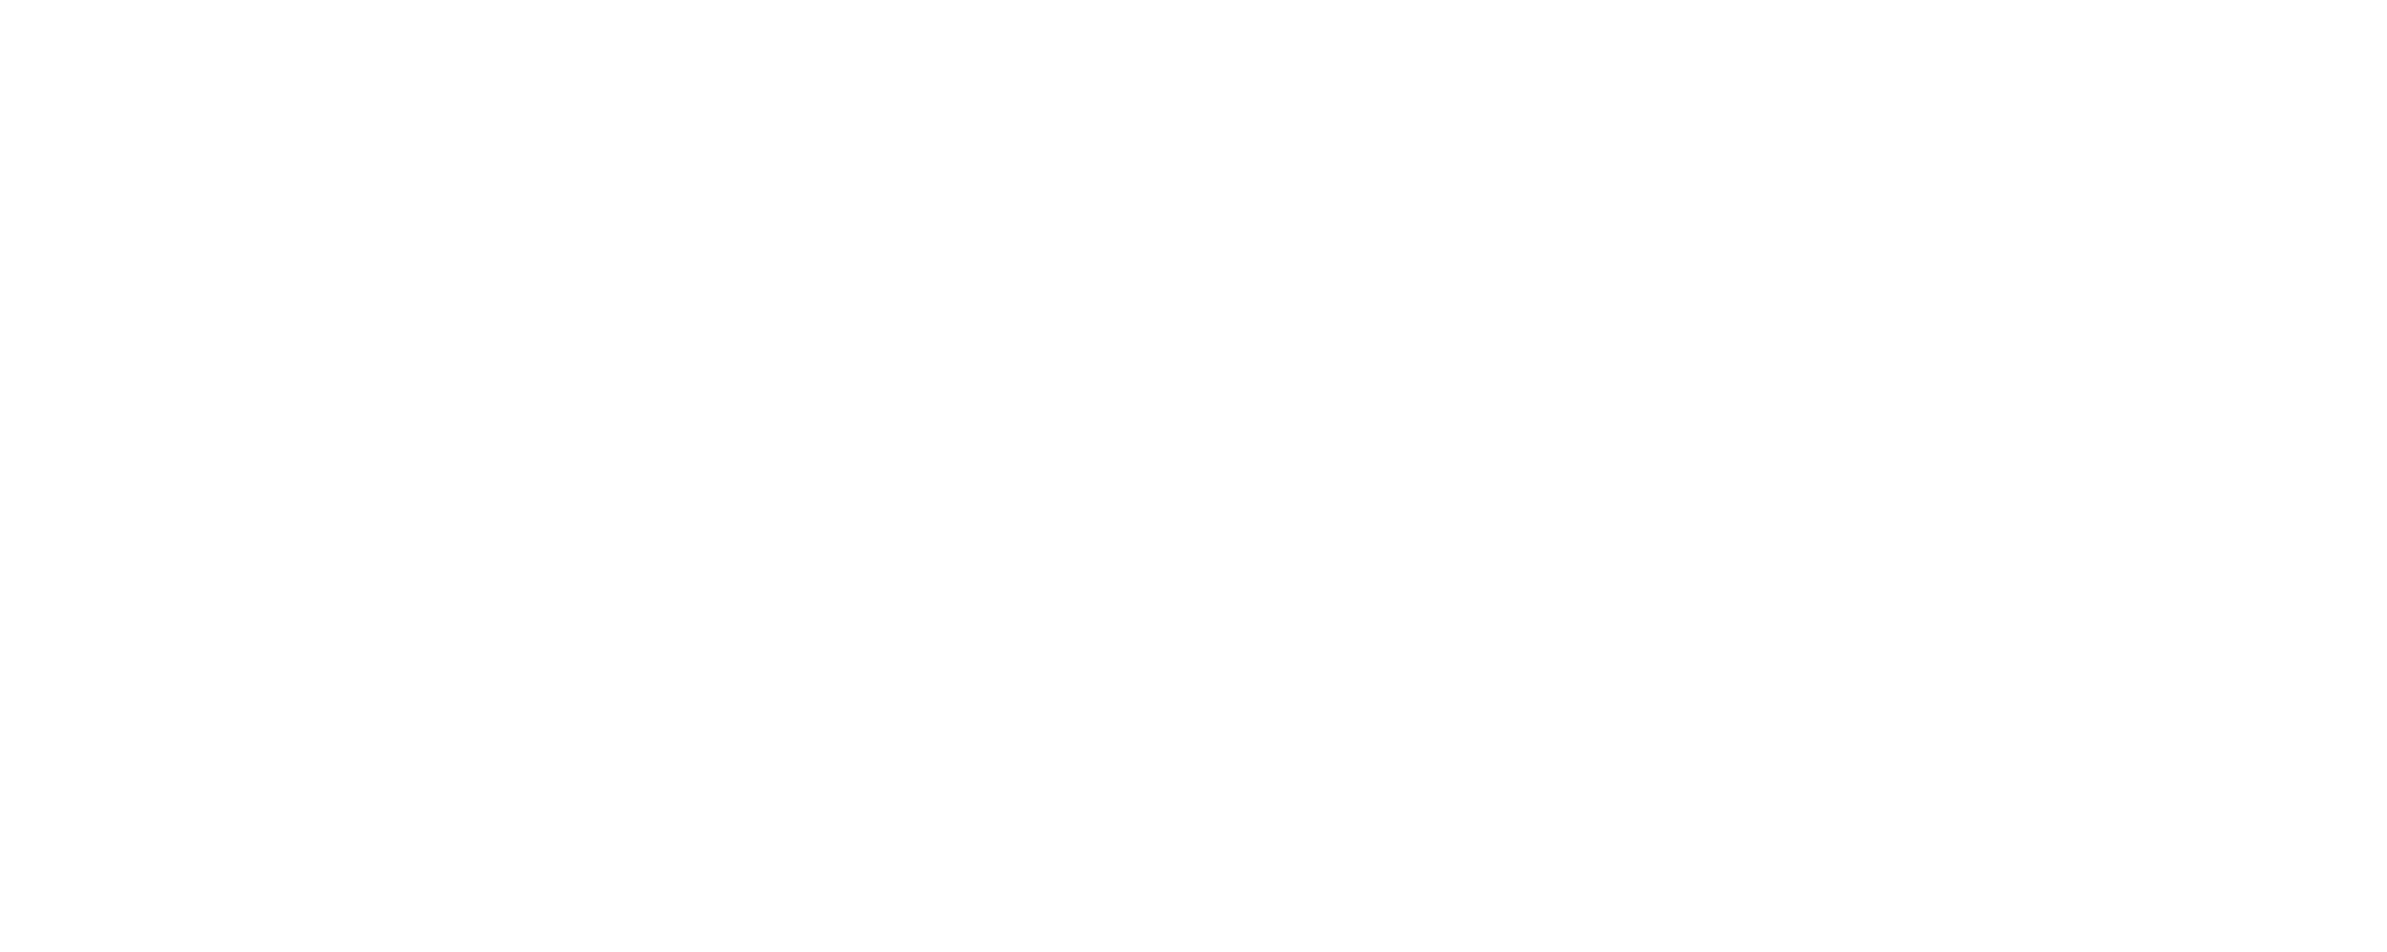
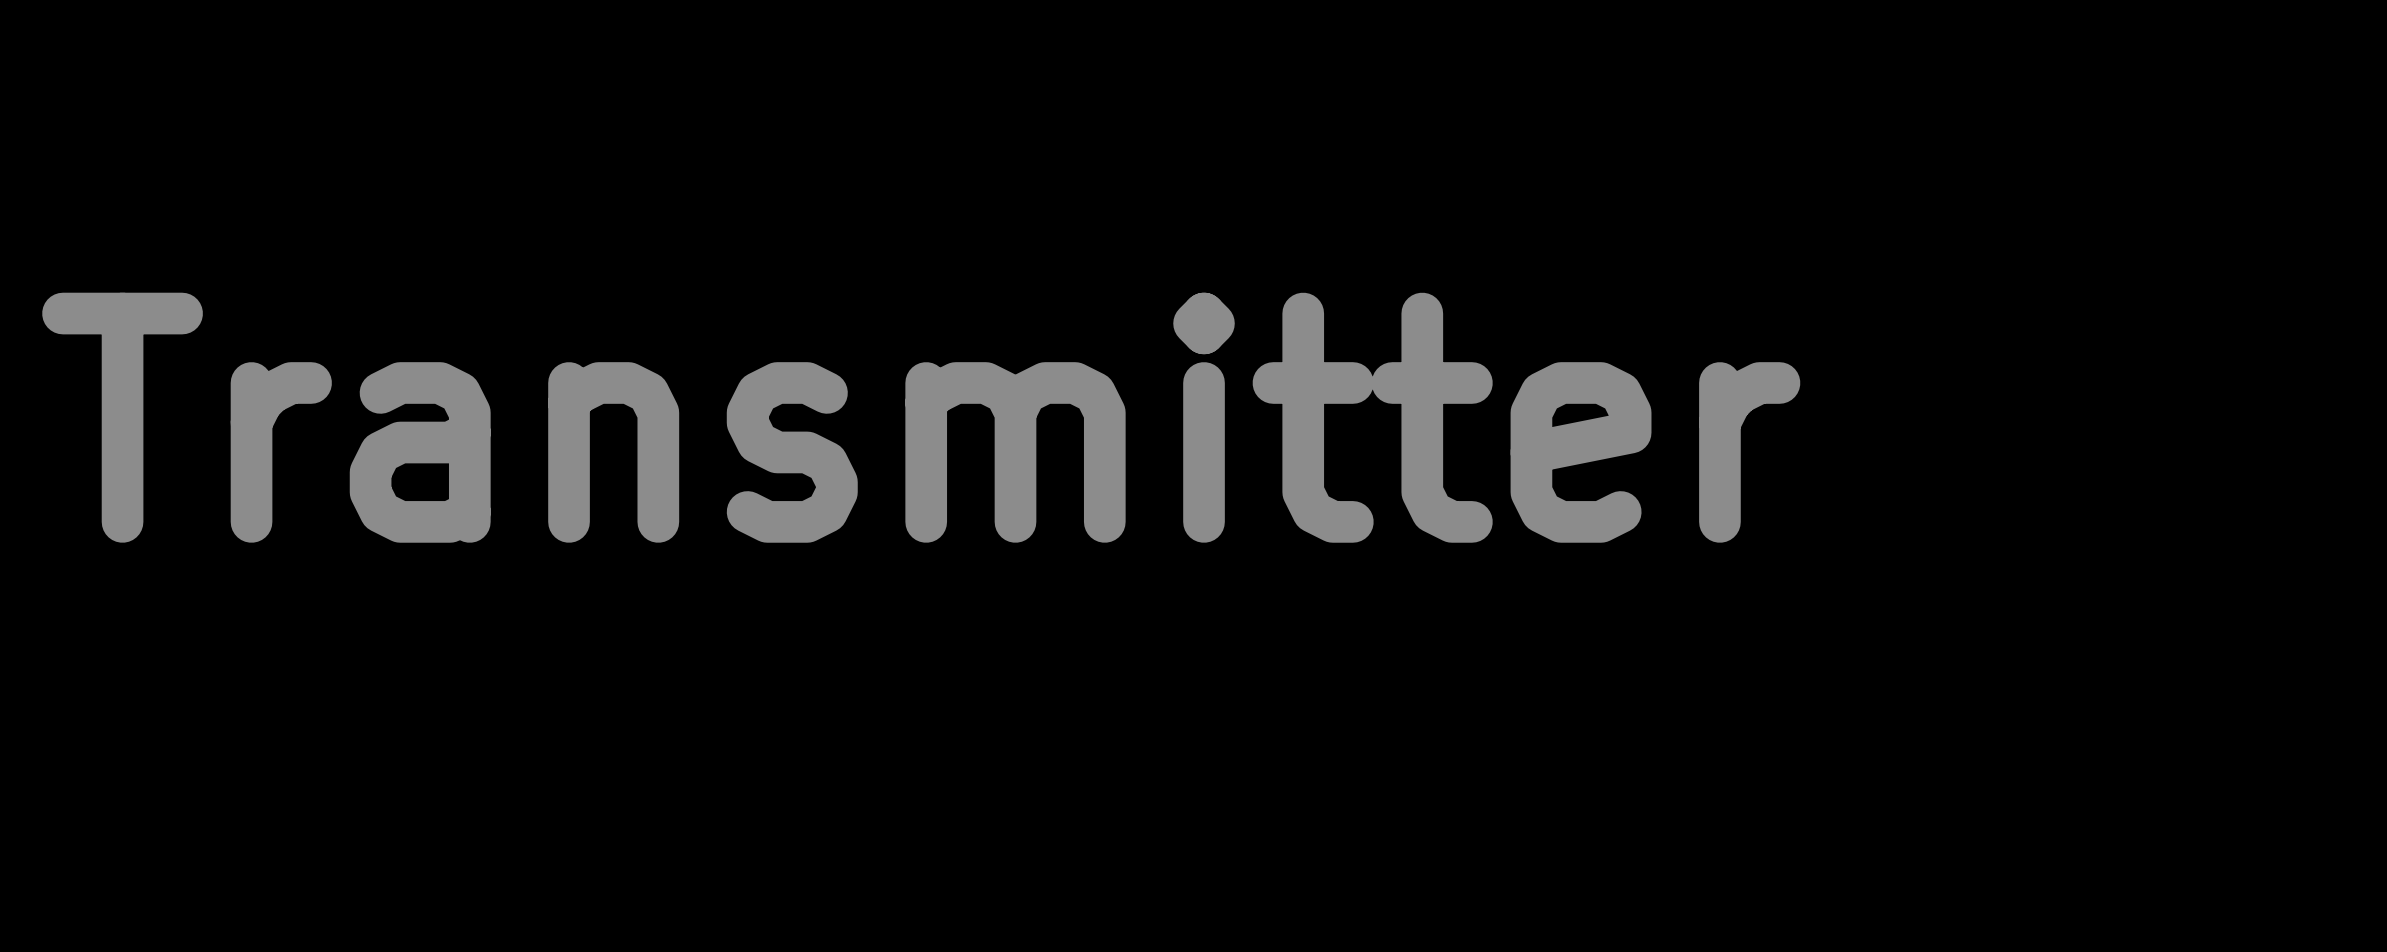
text: none -> Transmitter (921, 417)

